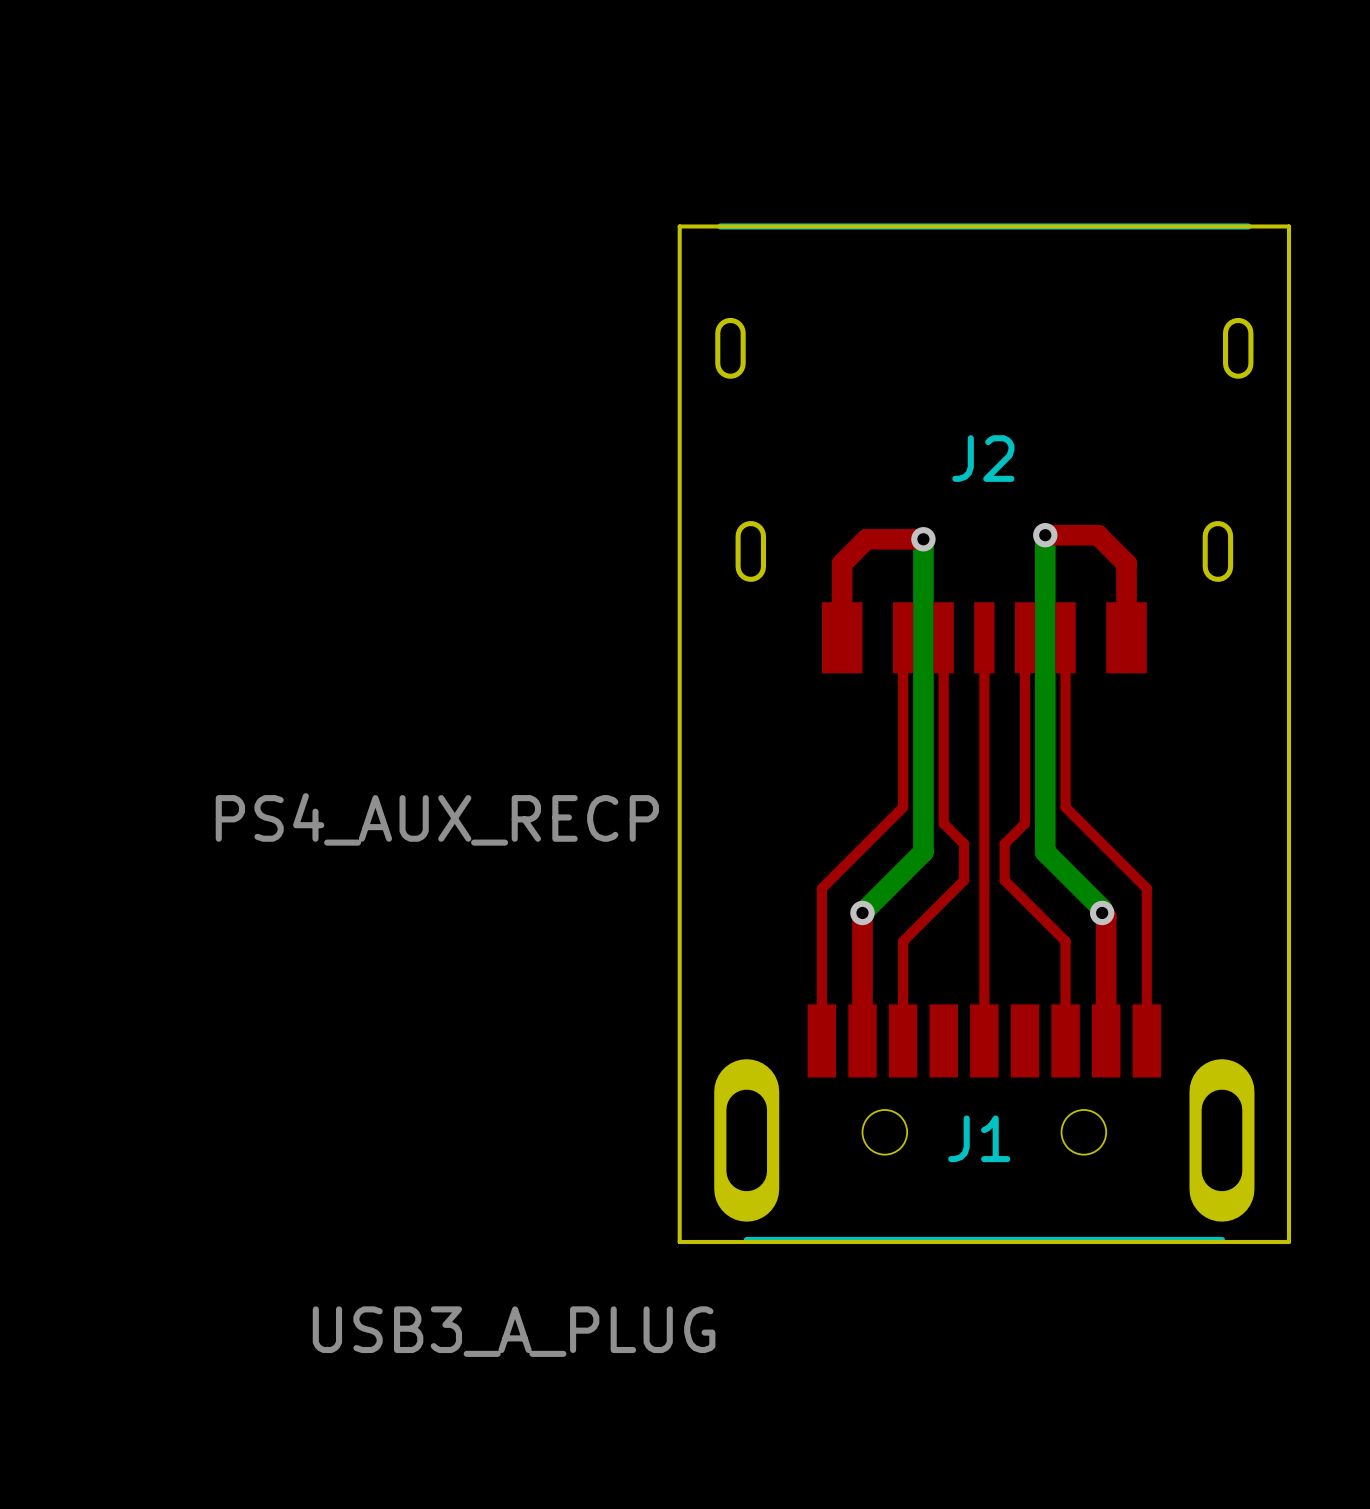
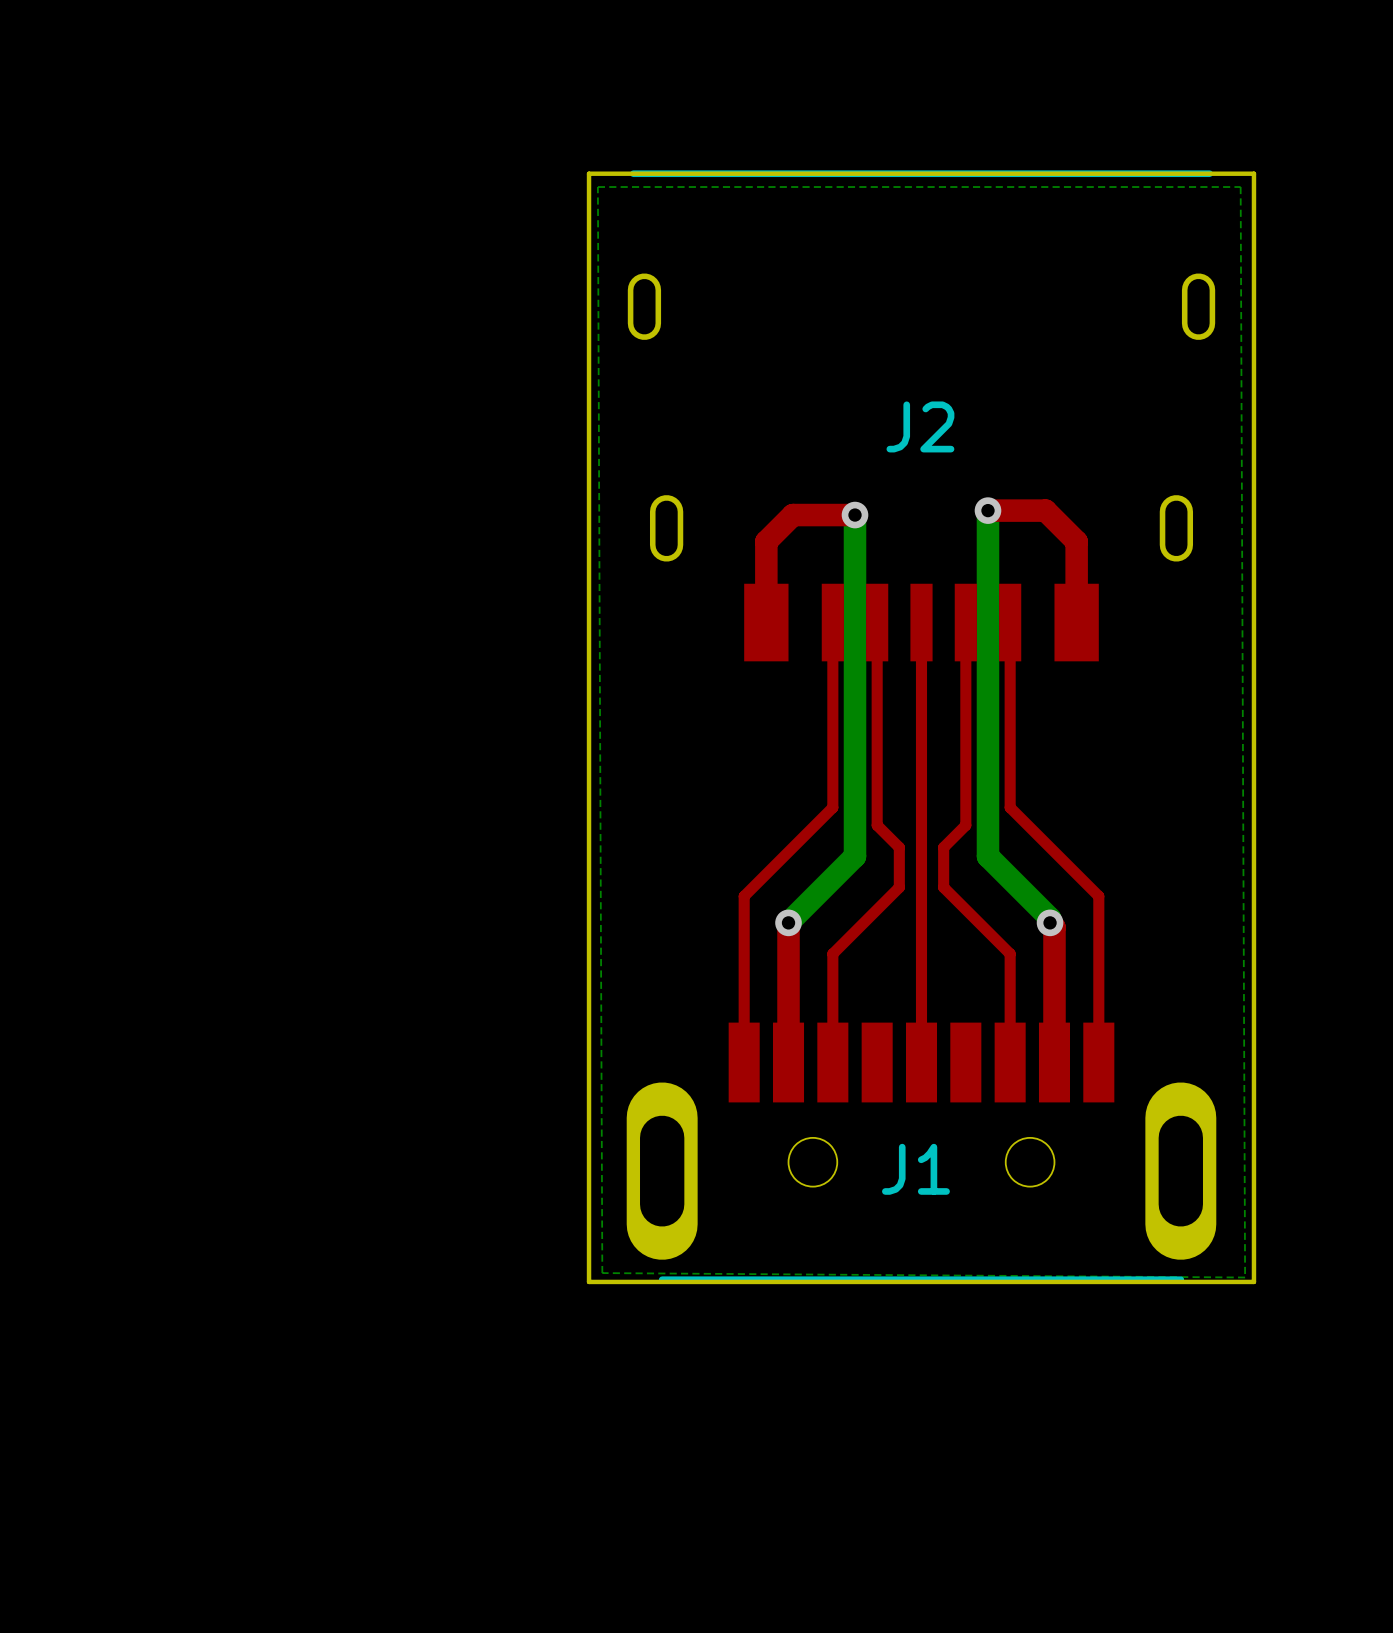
bottom zone outline: none -> (597, 187) (1240, 187) (1245, 1277) (602, 1273) (597, 187)
J2 value: PS4_AUX_RECP (437, 819) -> none
J1 value: USB3_A_PLUG (514, 1331) -> none

